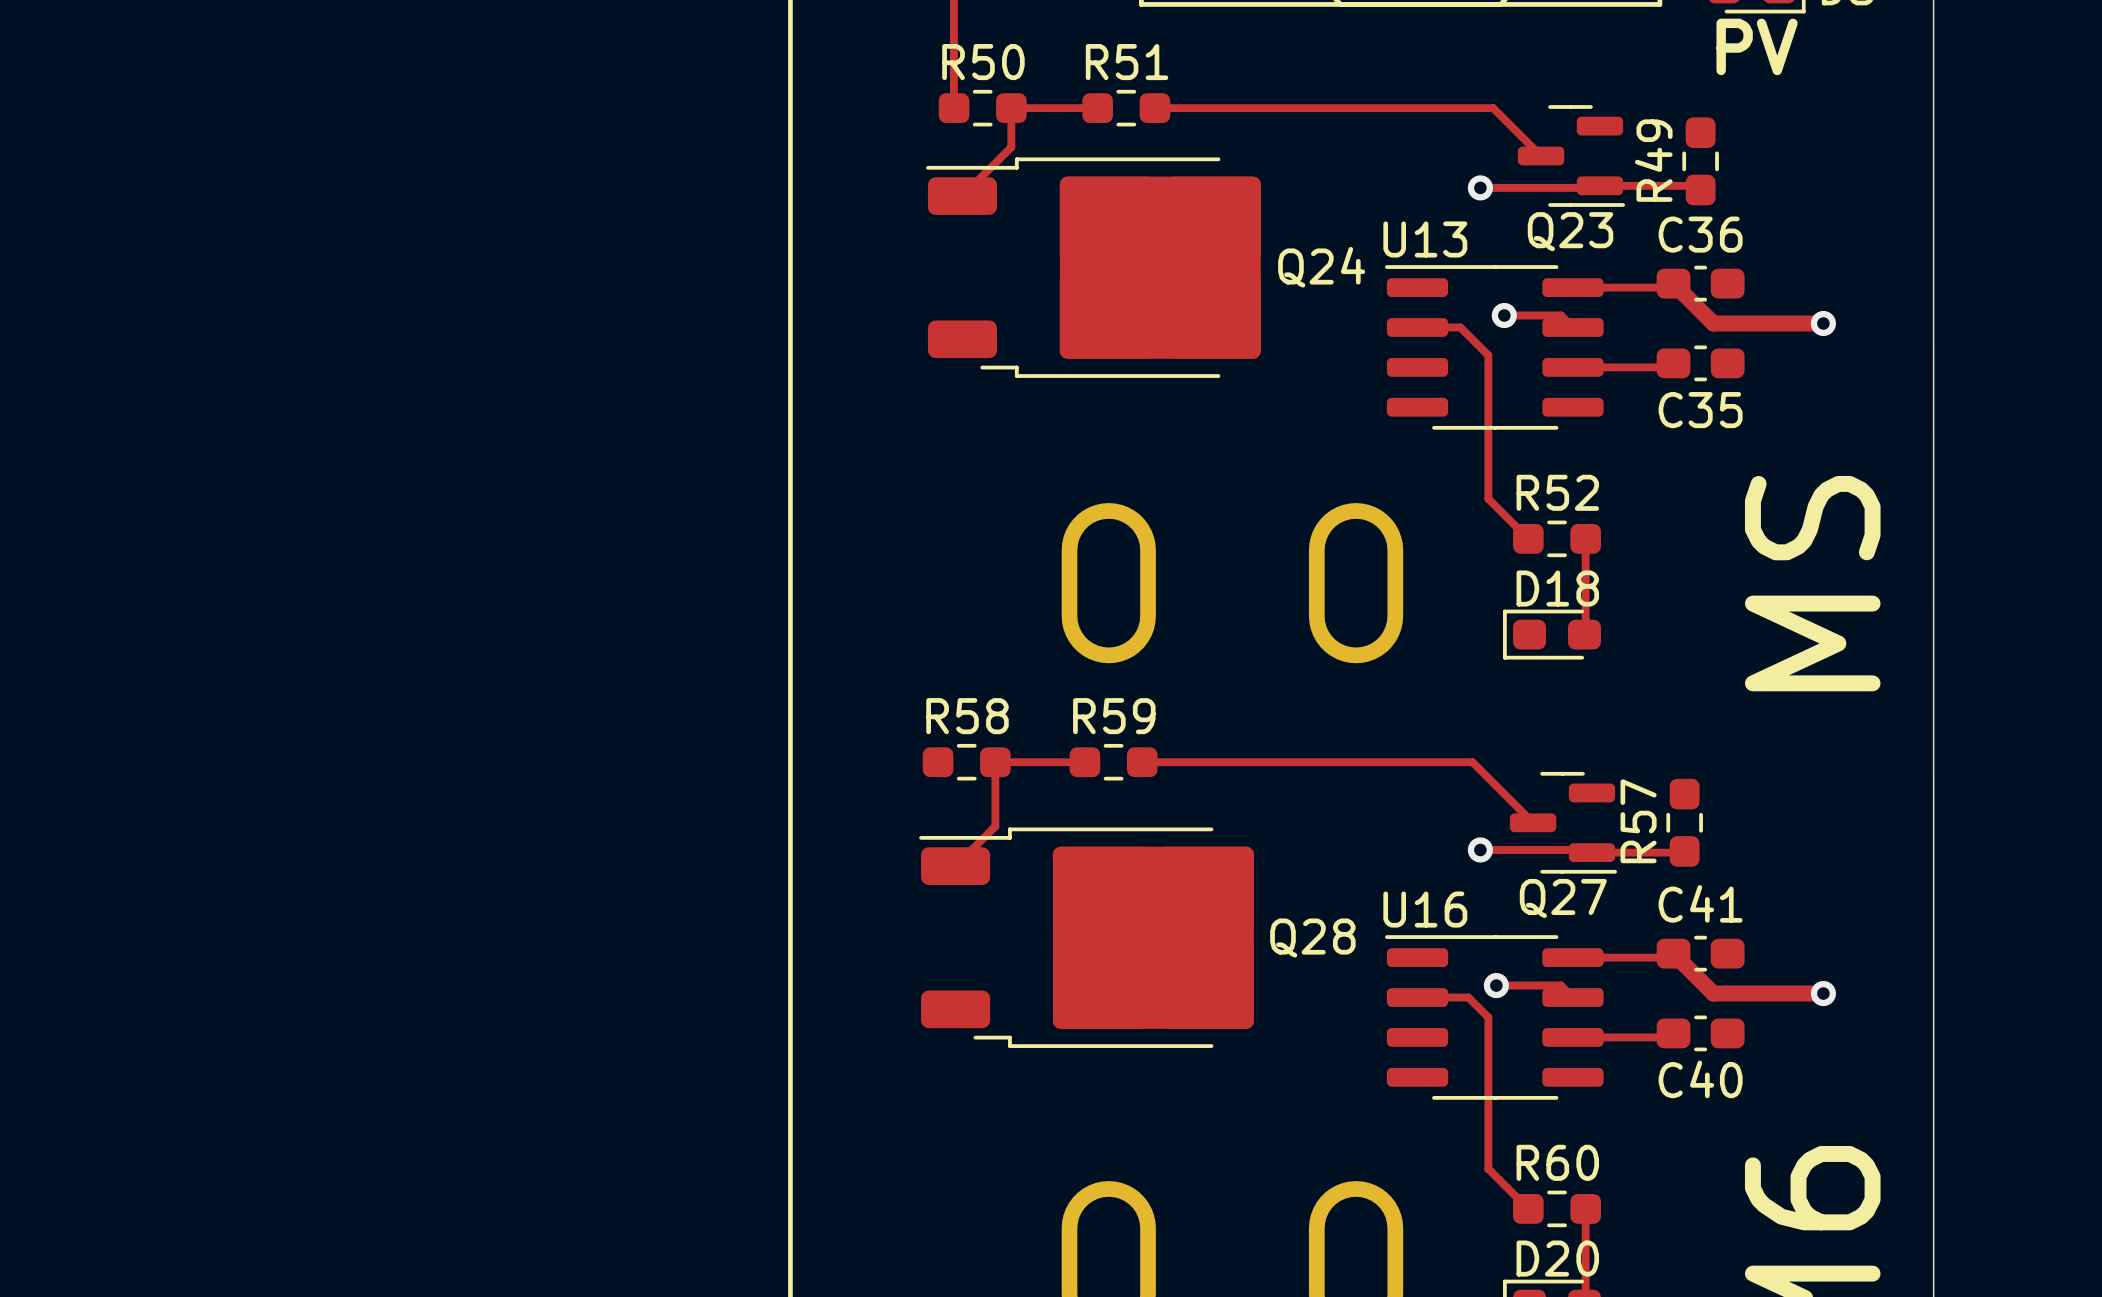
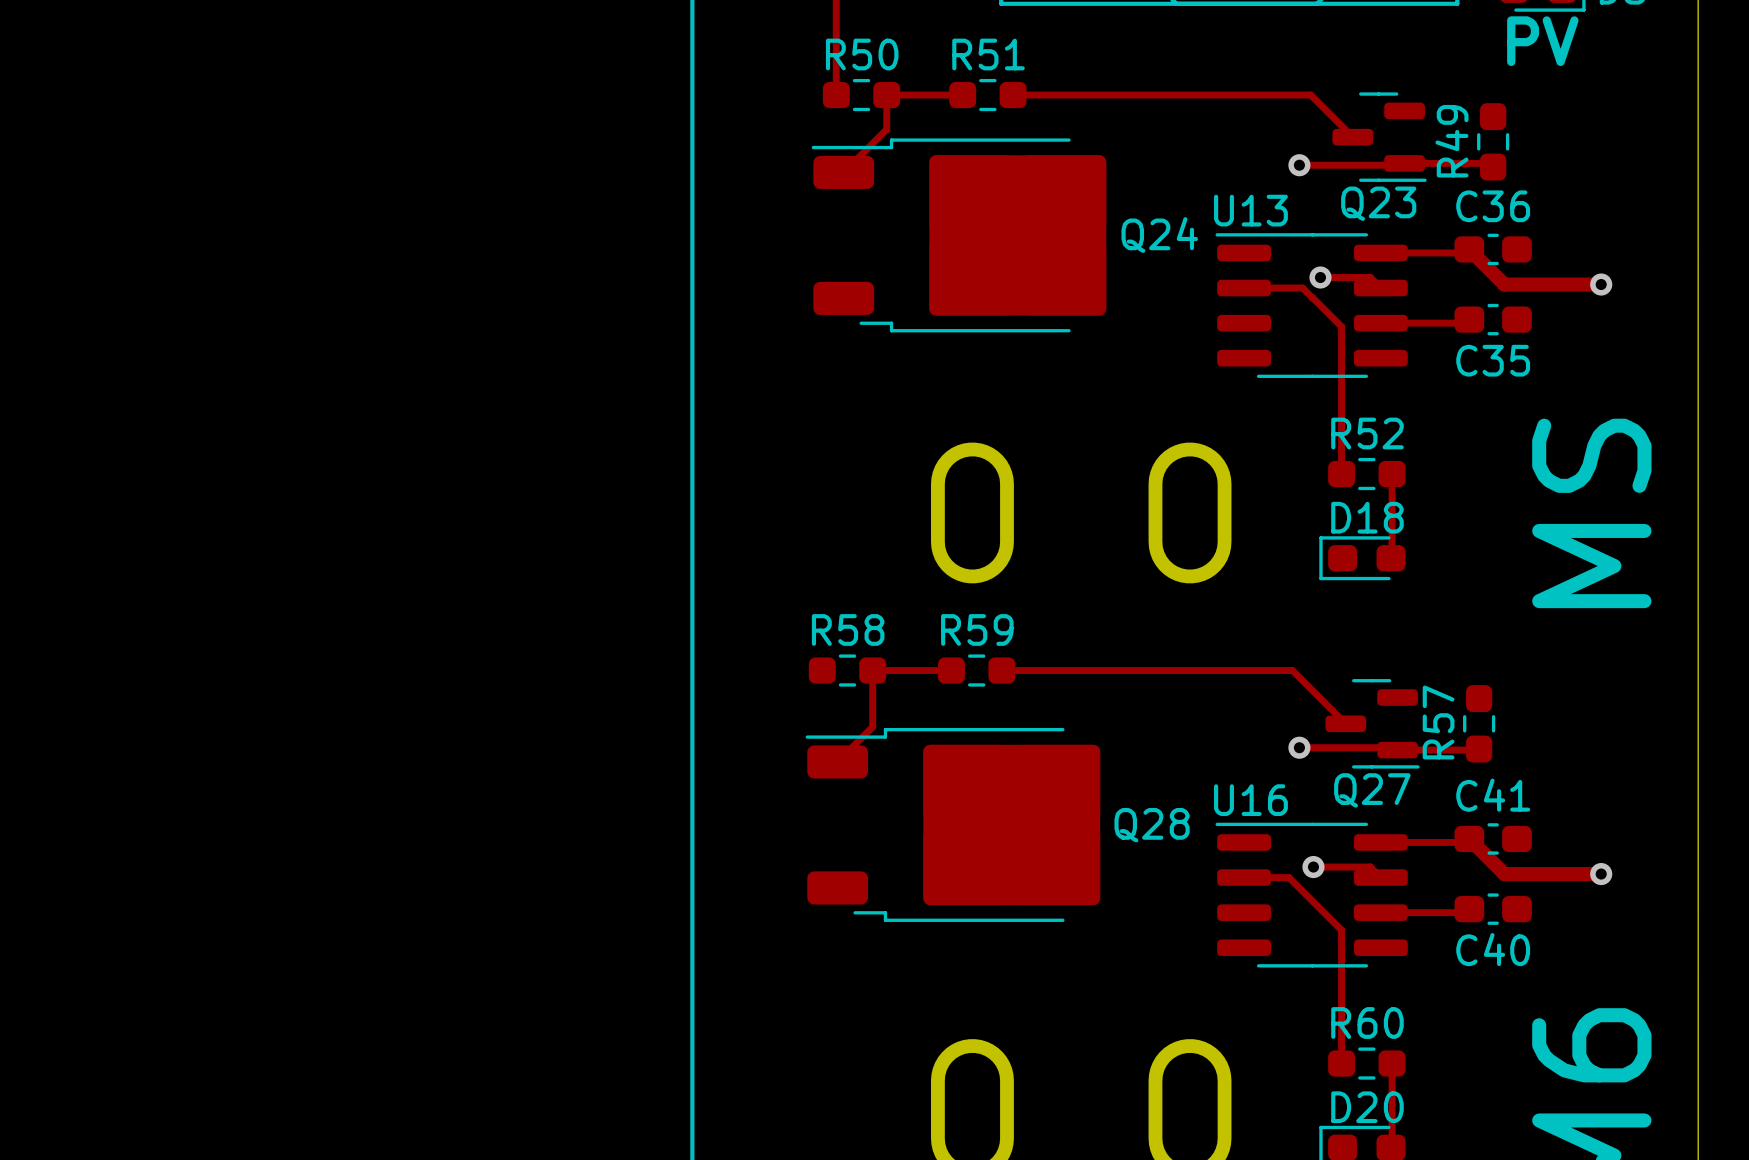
track: (1460, 327) (1488, 355) (1488, 498) (1528, 538) -> (1312, 297) (1341, 326) (1341, 473)
track: none -> (1281, 288) (1302, 288) (1312, 297)
track: (1488, 1017) (1488, 1168) (1528, 1208) -> (1306, 895) (1341, 930) (1341, 1063)

